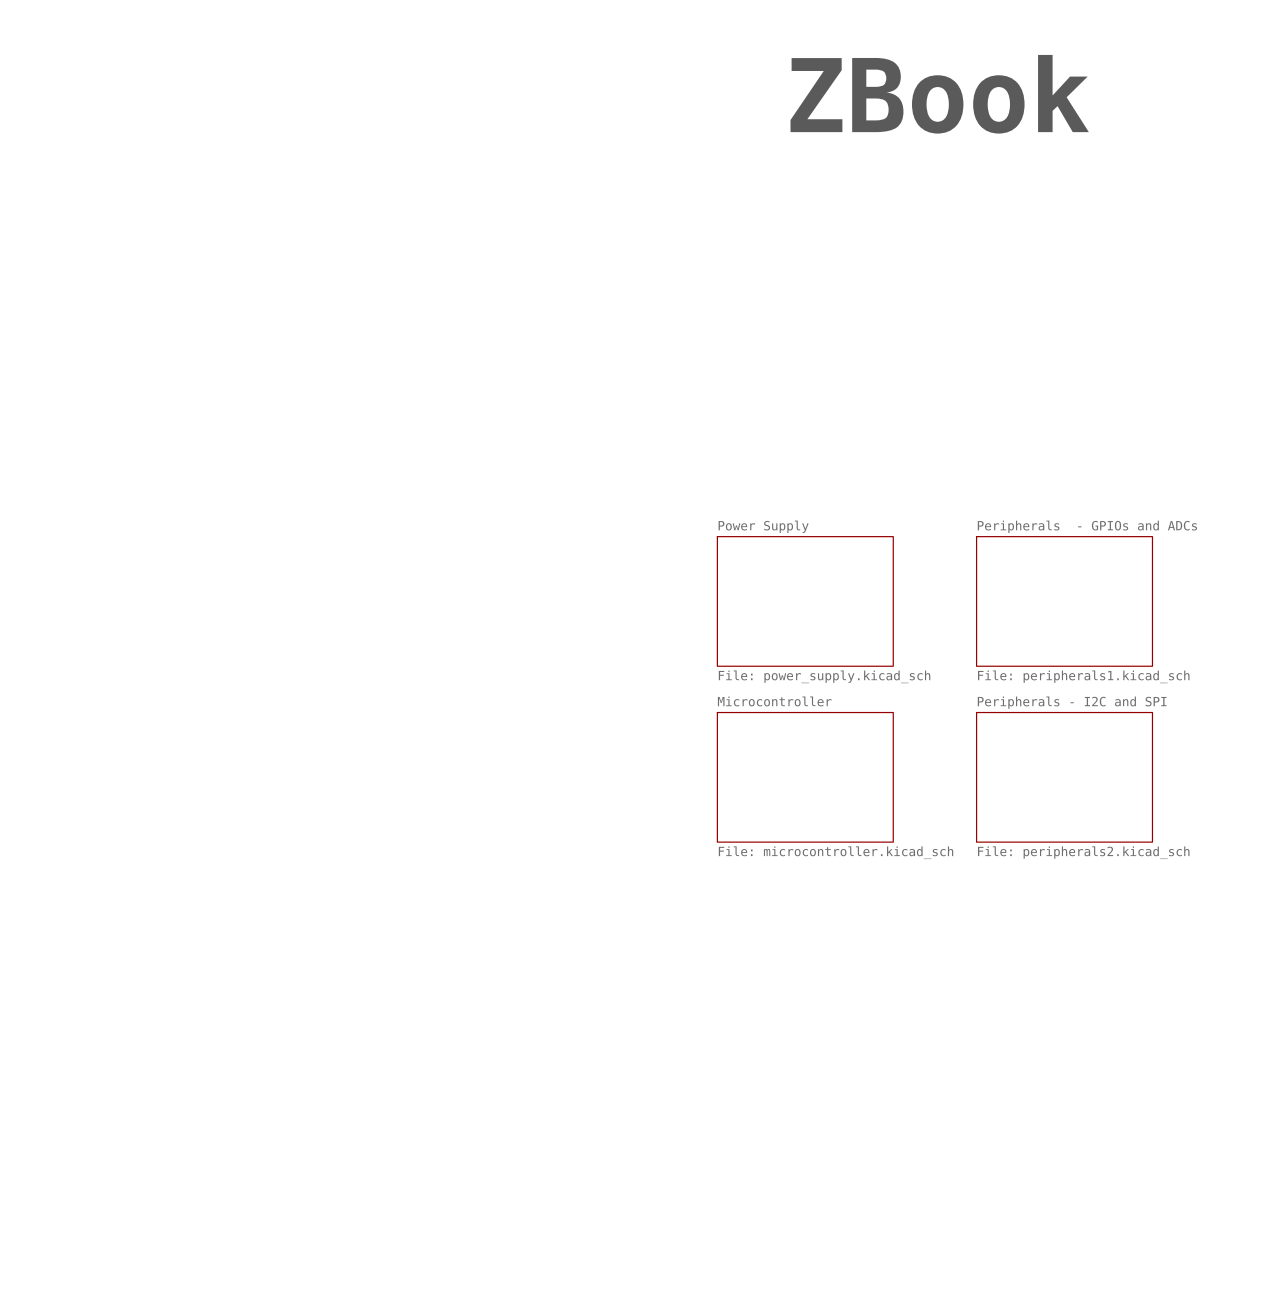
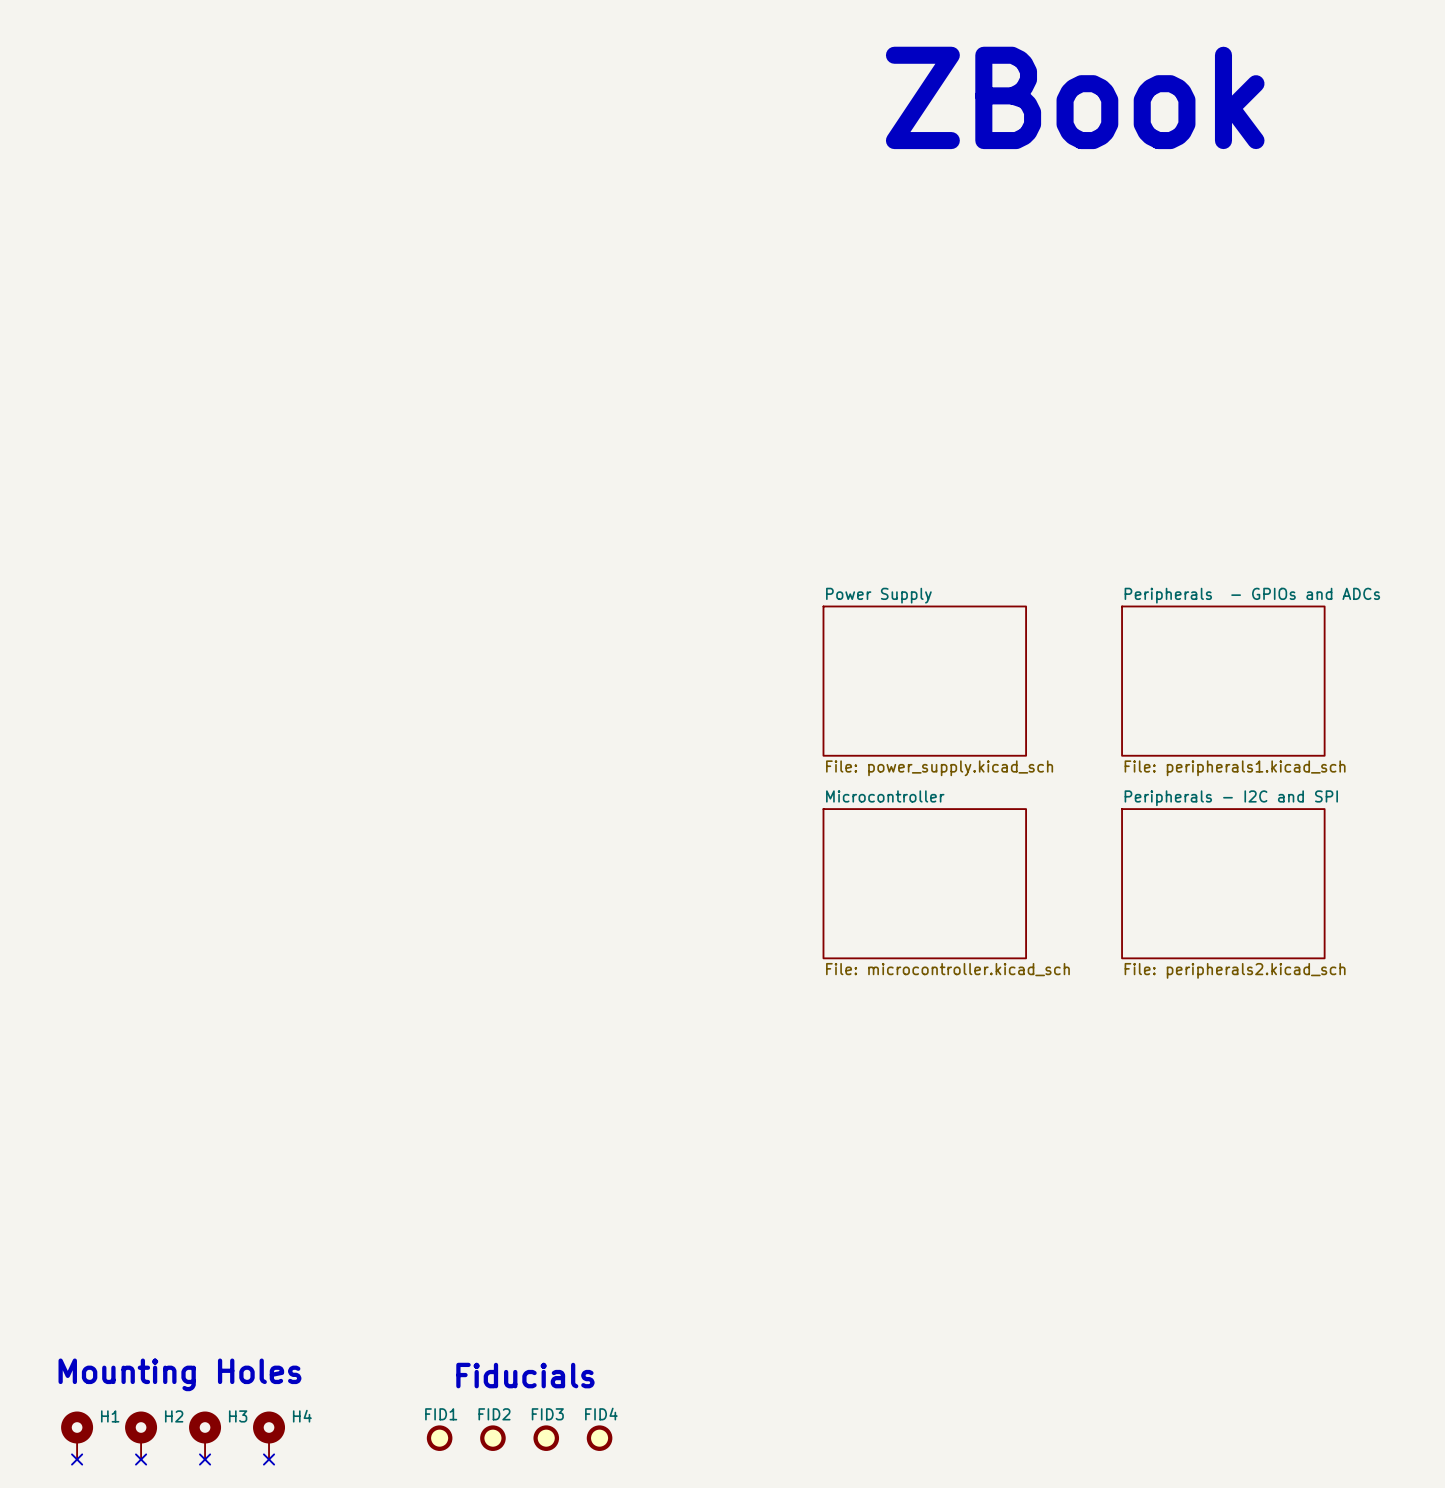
text: none -> Mounting Holes (179, 1374)
text: none -> Fiducials (525, 1375)
H1: none -> (77, 1435)
H2: none -> (141, 1435)
H3: none -> (205, 1435)
H4: none -> (269, 1435)
FID1: none -> (439, 1438)
FID2: none -> (492, 1438)
FID3: none -> (546, 1438)
FID4: none -> (599, 1438)
no-connect mark: none -> (77, 1459)
no-connect mark: none -> (141, 1459)
no-connect mark: none -> (205, 1459)
no-connect mark: none -> (269, 1459)

